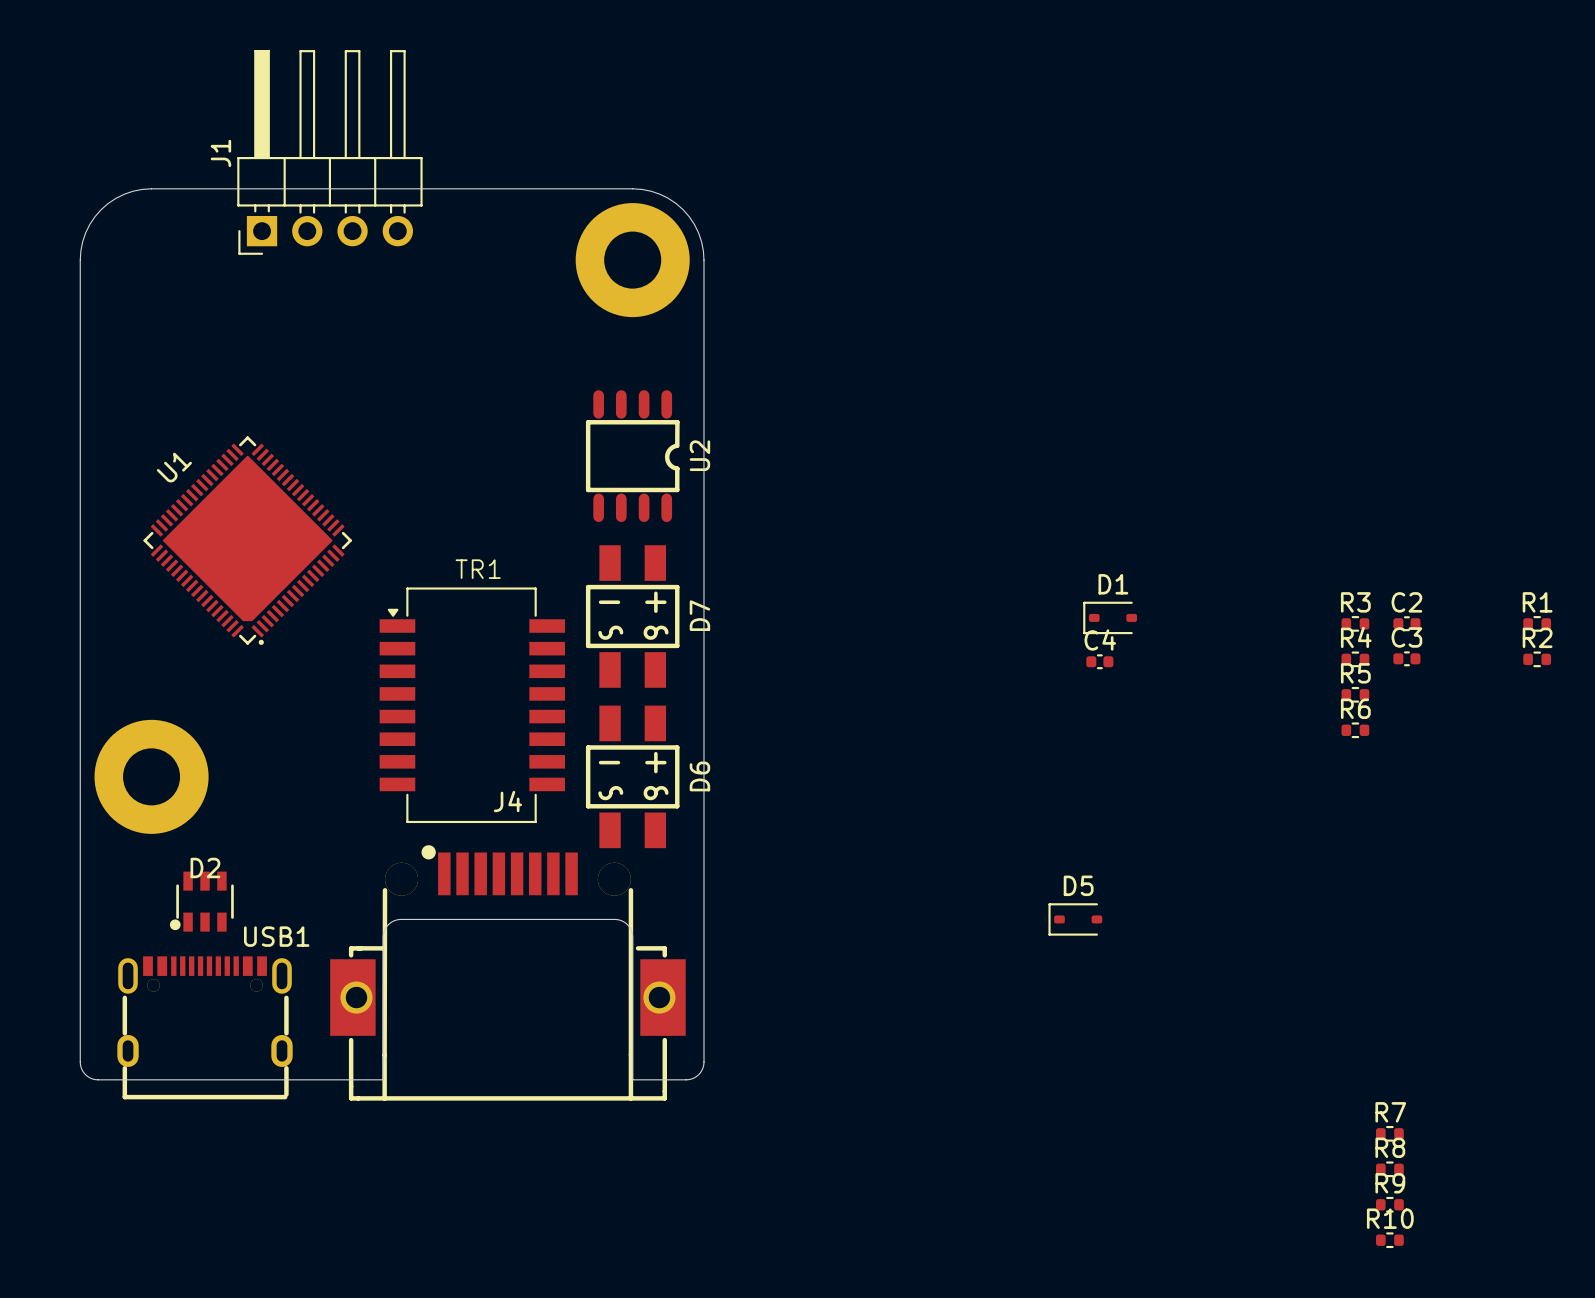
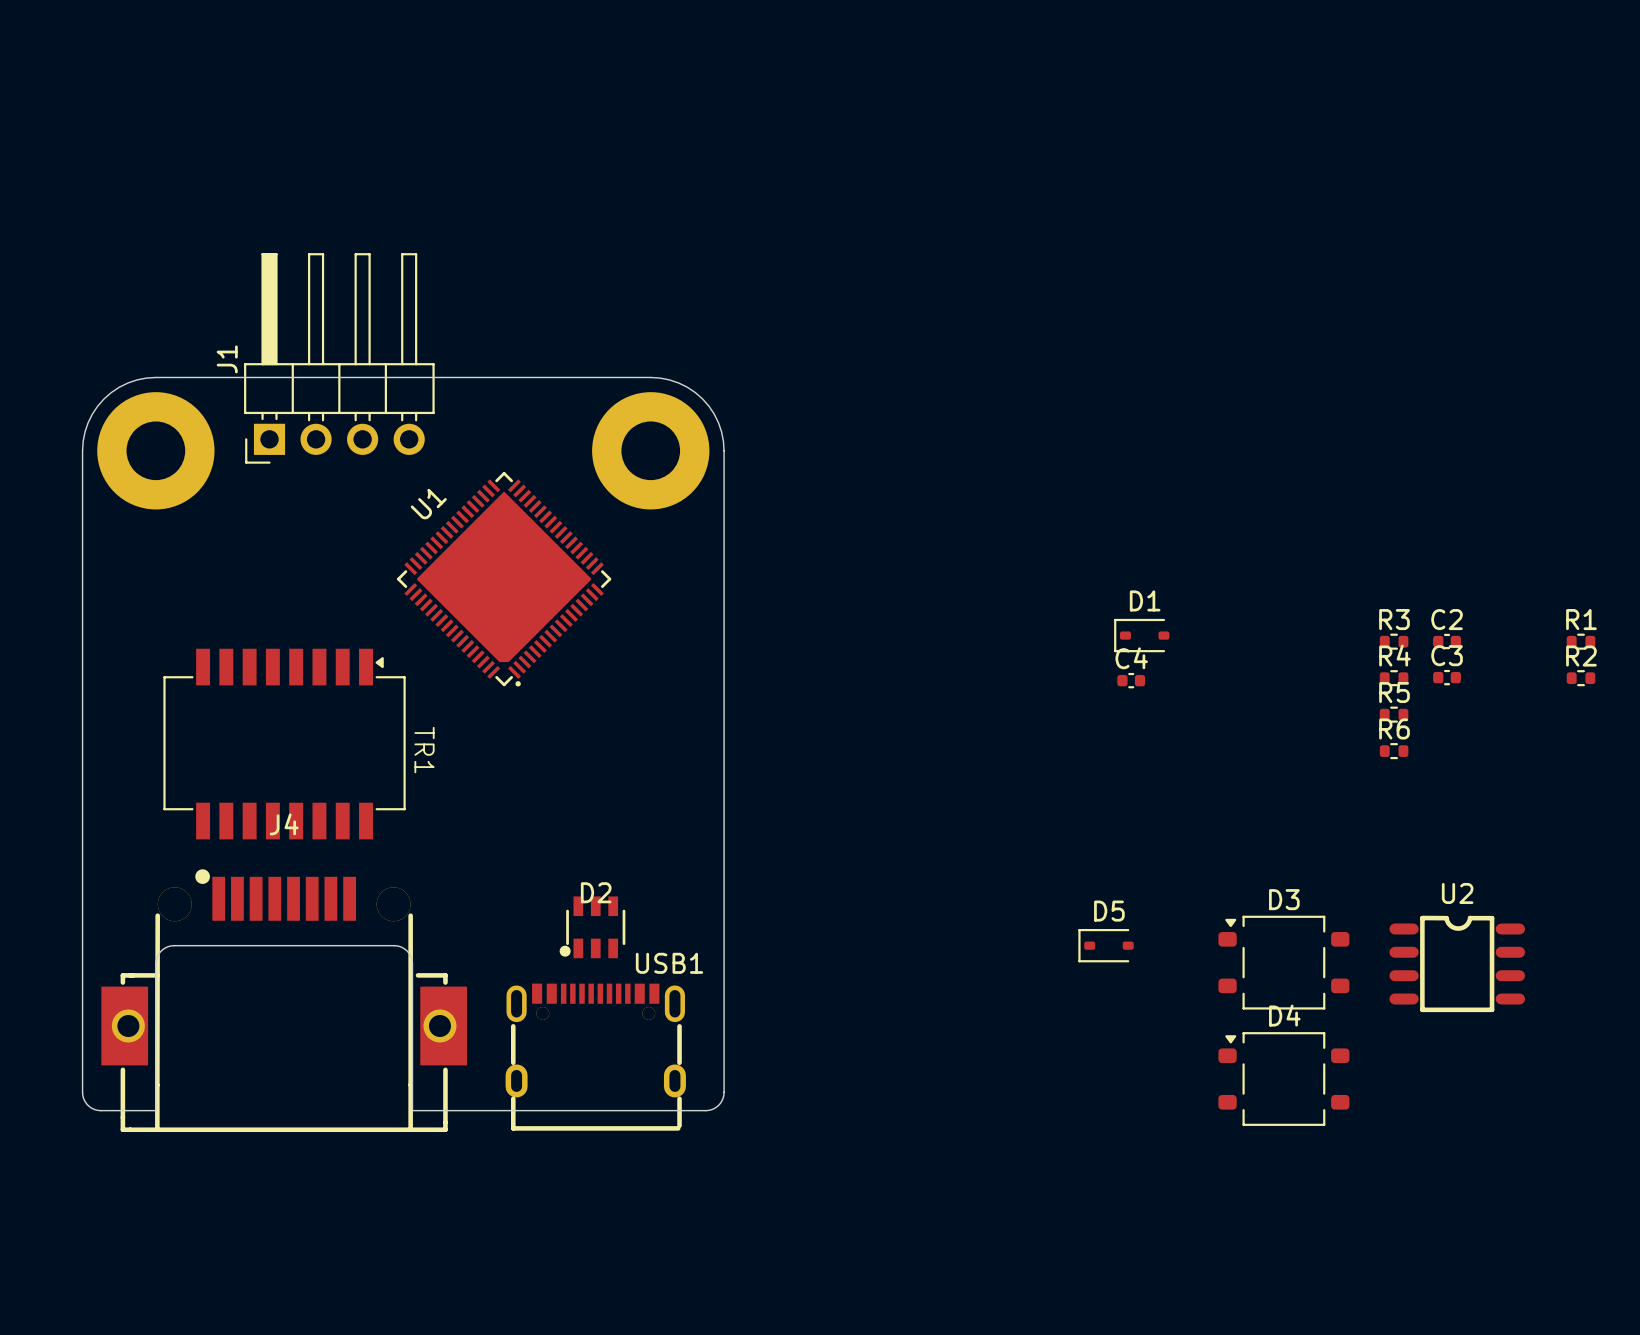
J1 position: (329, 152) -> (339, 358)
part position: (632, 260) -> (650, 450)
board edge: (80, 438) (80, 260) (82, 241) (89, 224) (108, 203) (124, 194) (151, 188) (632, 188) (659, 194) (676, 203) (689, 216) (698, 232) (703, 250) (703, 438) -> (82, 450) (88, 422) (104, 398) (127, 383) (155, 377) (660, 378) (687, 387) (708, 406) (721, 431) (724, 450)
part: none -> (155, 450)
U2 rotation: 0° (634, 456) -> 90° counterclockwise (1457, 962)
U2 position: (634, 456) -> (1457, 962)
U1 position: (247, 540) -> (504, 579)
D7: (632, 616) -> none
TR1 rotation: 0° (472, 705) -> 90° clockwise (284, 744)
TR1 position: (472, 705) -> (284, 744)
part: (151, 776) -> none
D6: (632, 776) -> none
D2 position: (201, 901) -> (592, 927)
D3: none -> (1283, 962)
J4 position: (507, 972) -> (284, 1000)
USB1 position: (205, 1027) -> (595, 1057)
D4: none -> (1283, 1079)
board edge: (151, 1079) (383, 1079) (383, 935) (389, 923) (401, 919) (614, 919) (624, 922) (630, 929) (632, 937) (632, 1079) -> (155, 1110) (155, 961) (161, 951) (174, 945) (394, 945) (403, 948) (410, 956) (412, 964) (412, 1110) (650, 1110)
R7: (1389, 1133) -> none
R8: (1389, 1169) -> none
R9: (1389, 1204) -> none
R10: (1389, 1240) -> none

